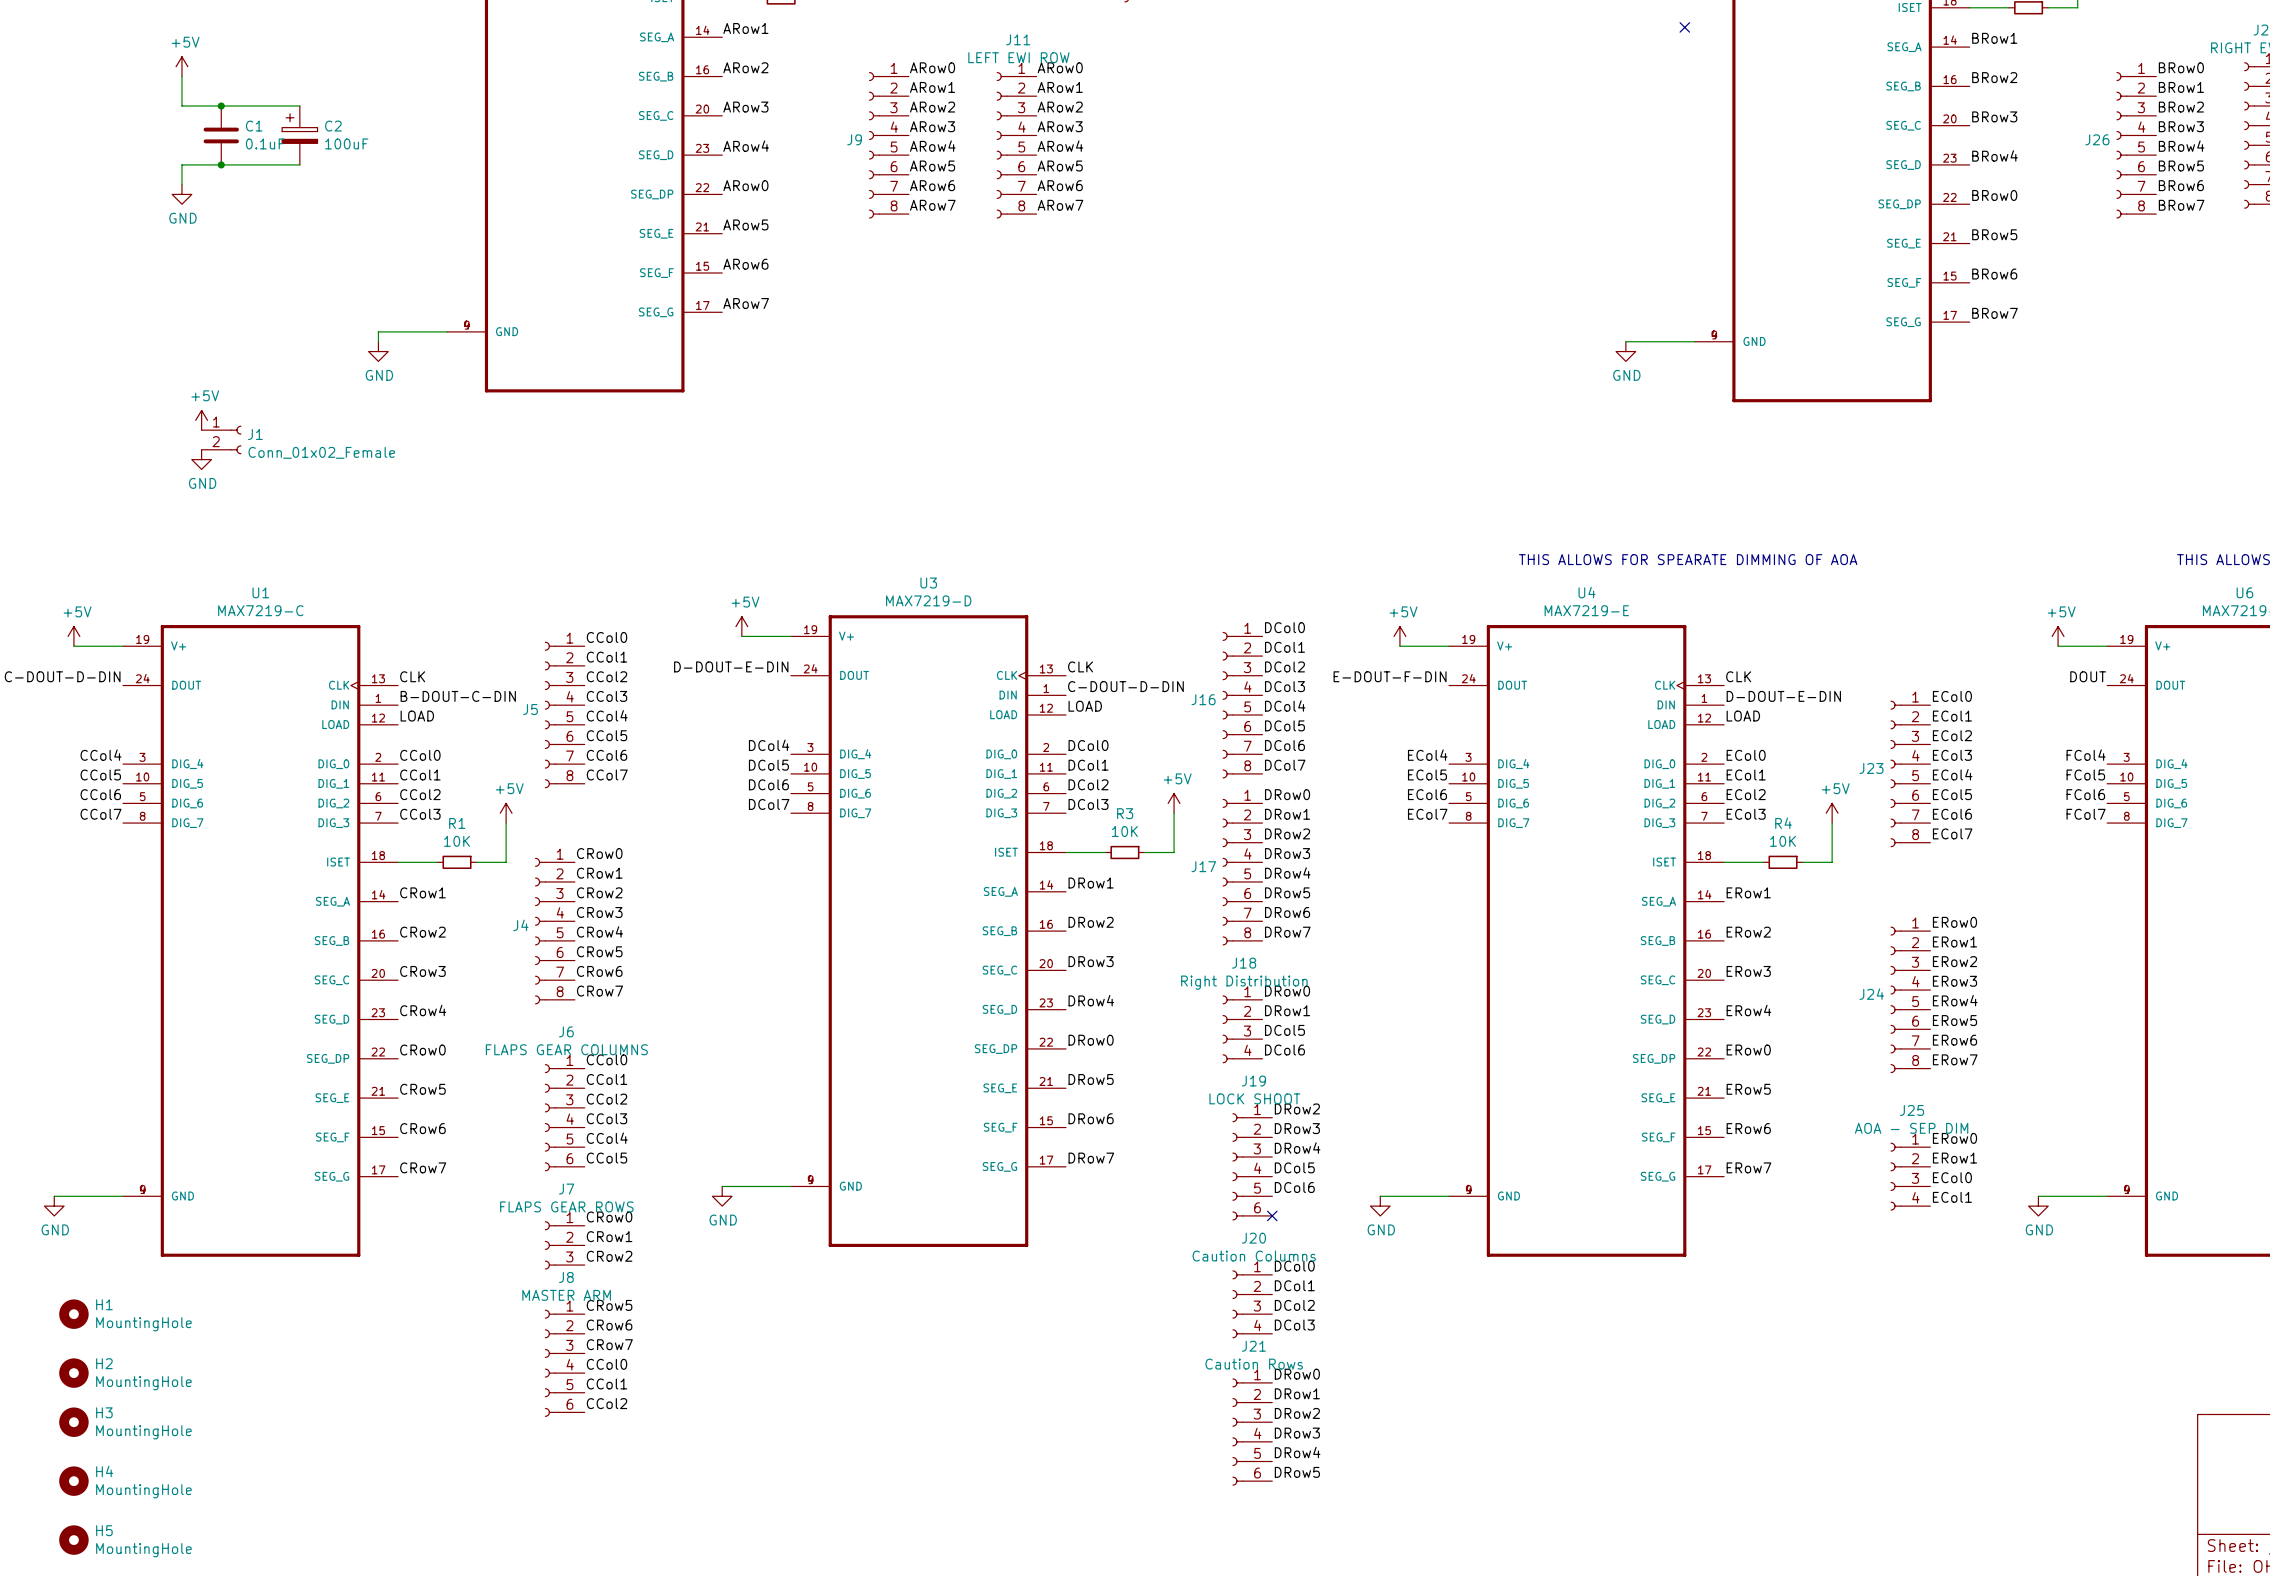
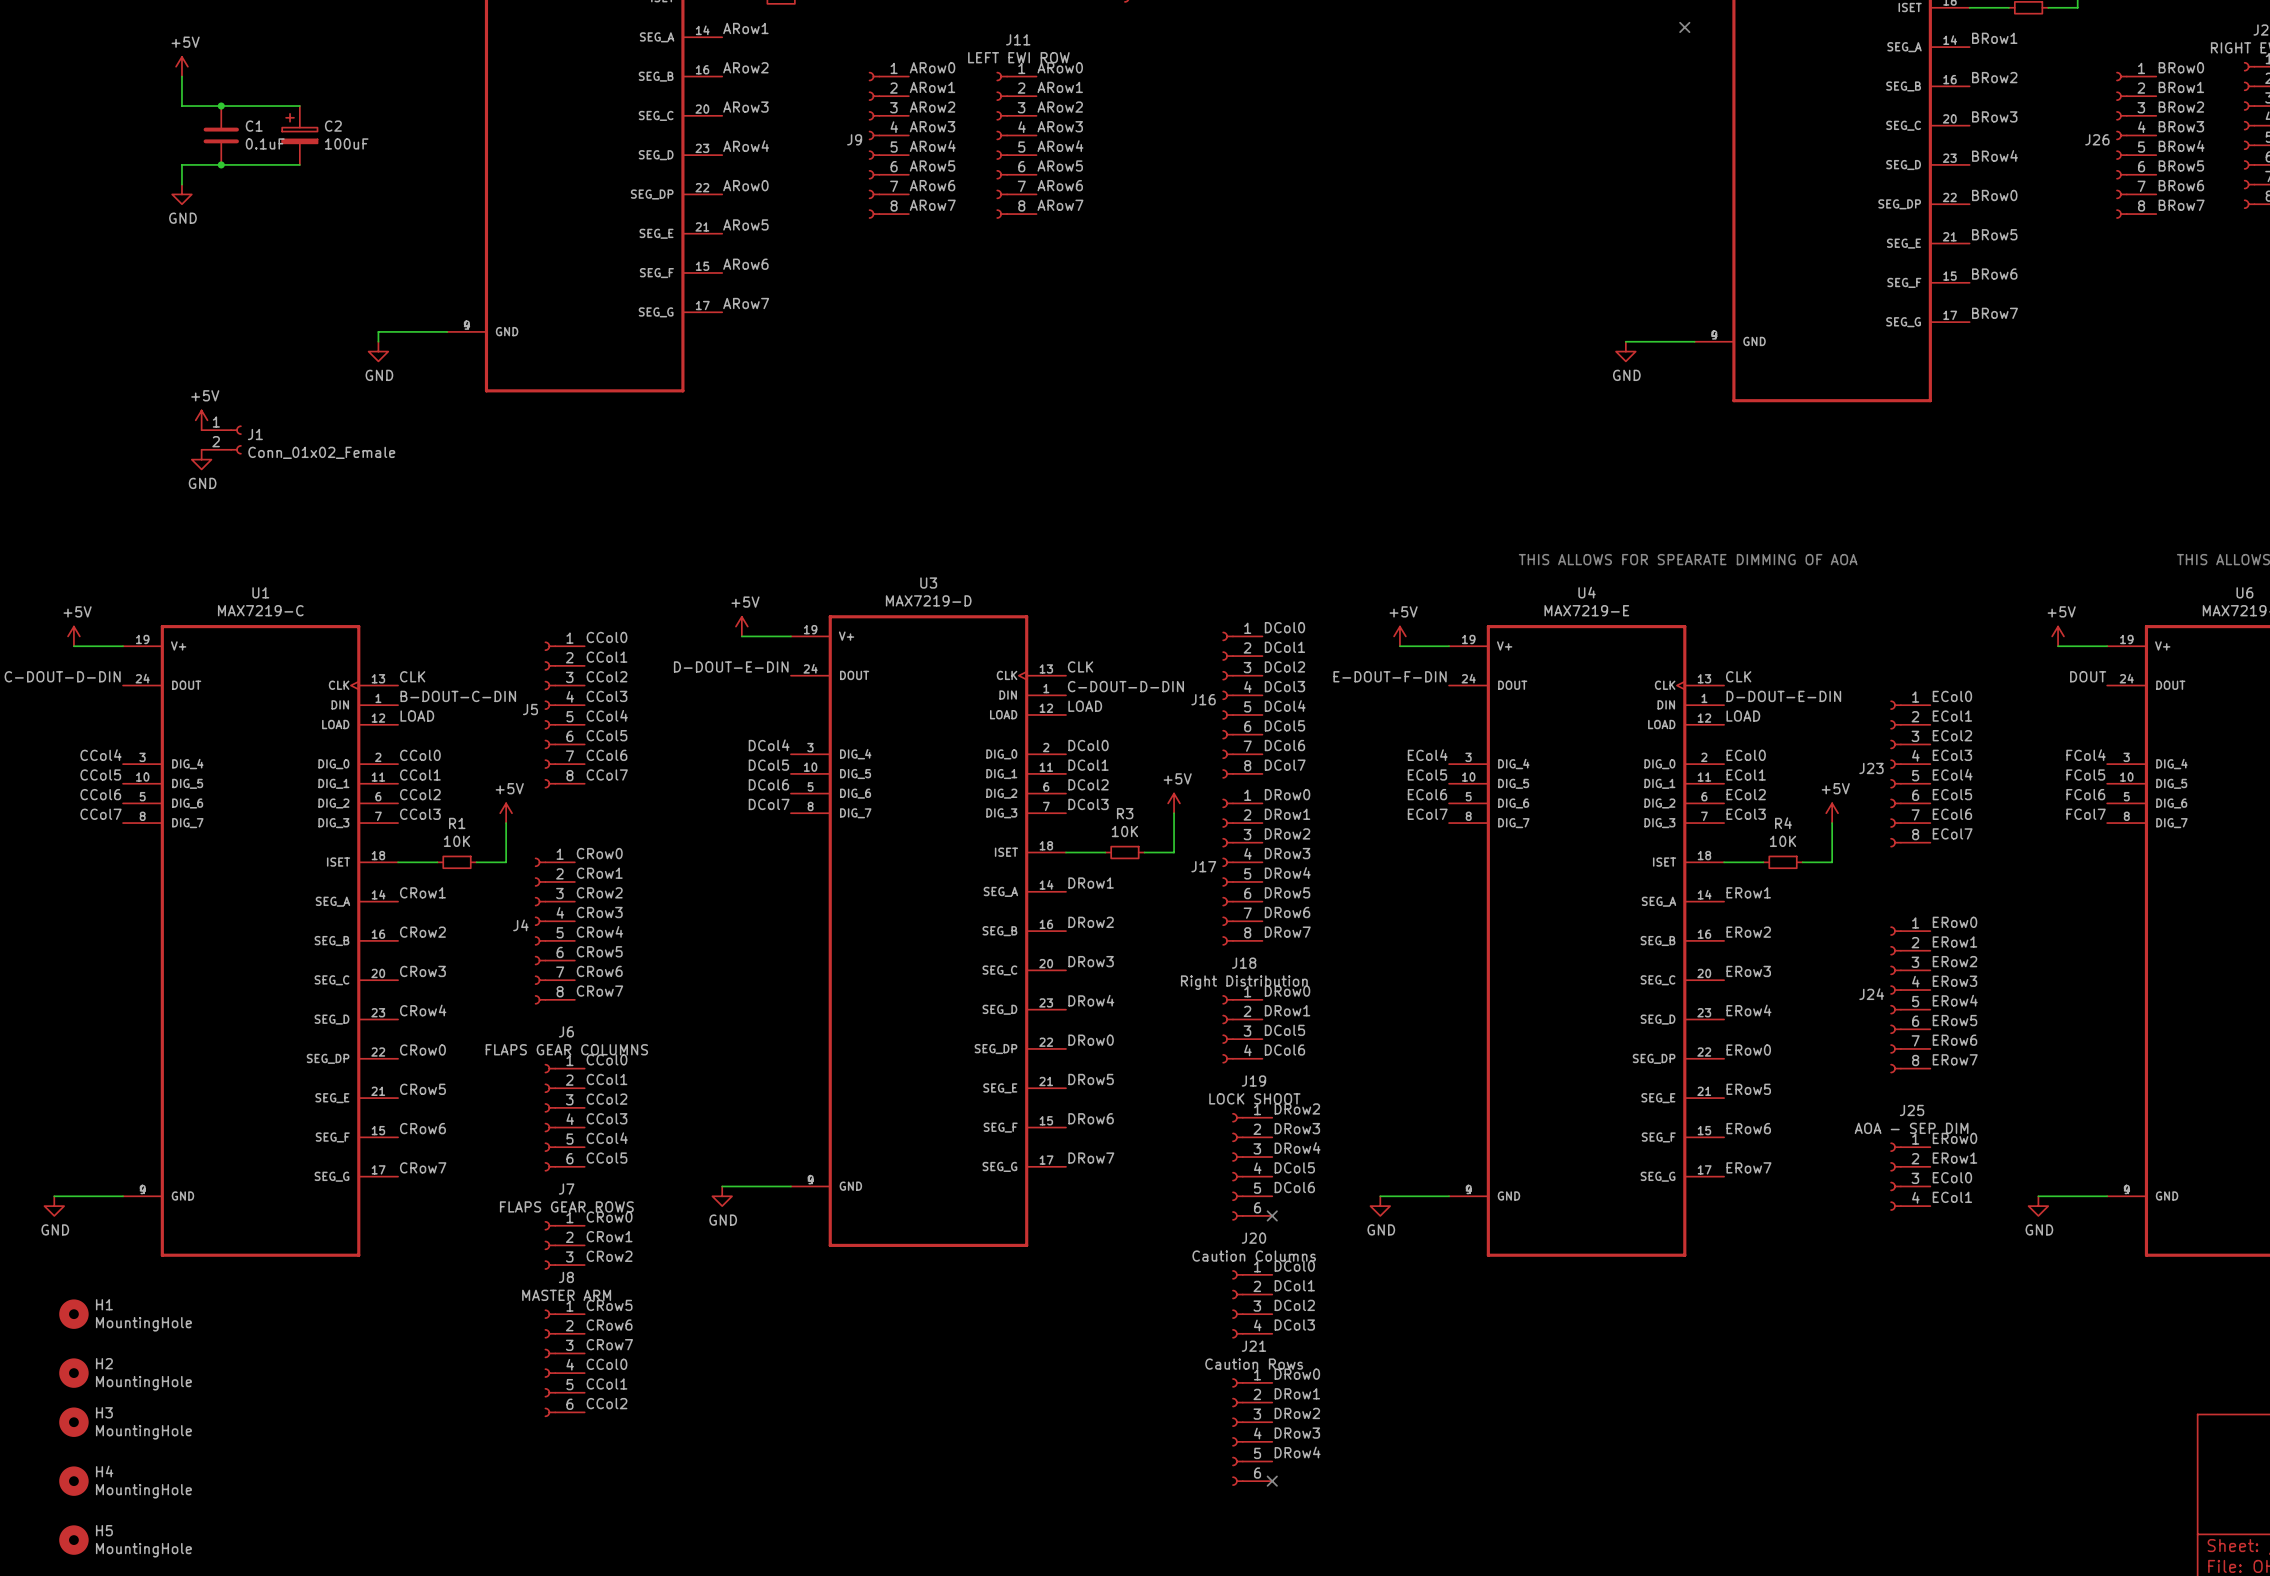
label: DRow5 (1297, 1472) -> none
no-connect mark: none -> (1272, 1481)

